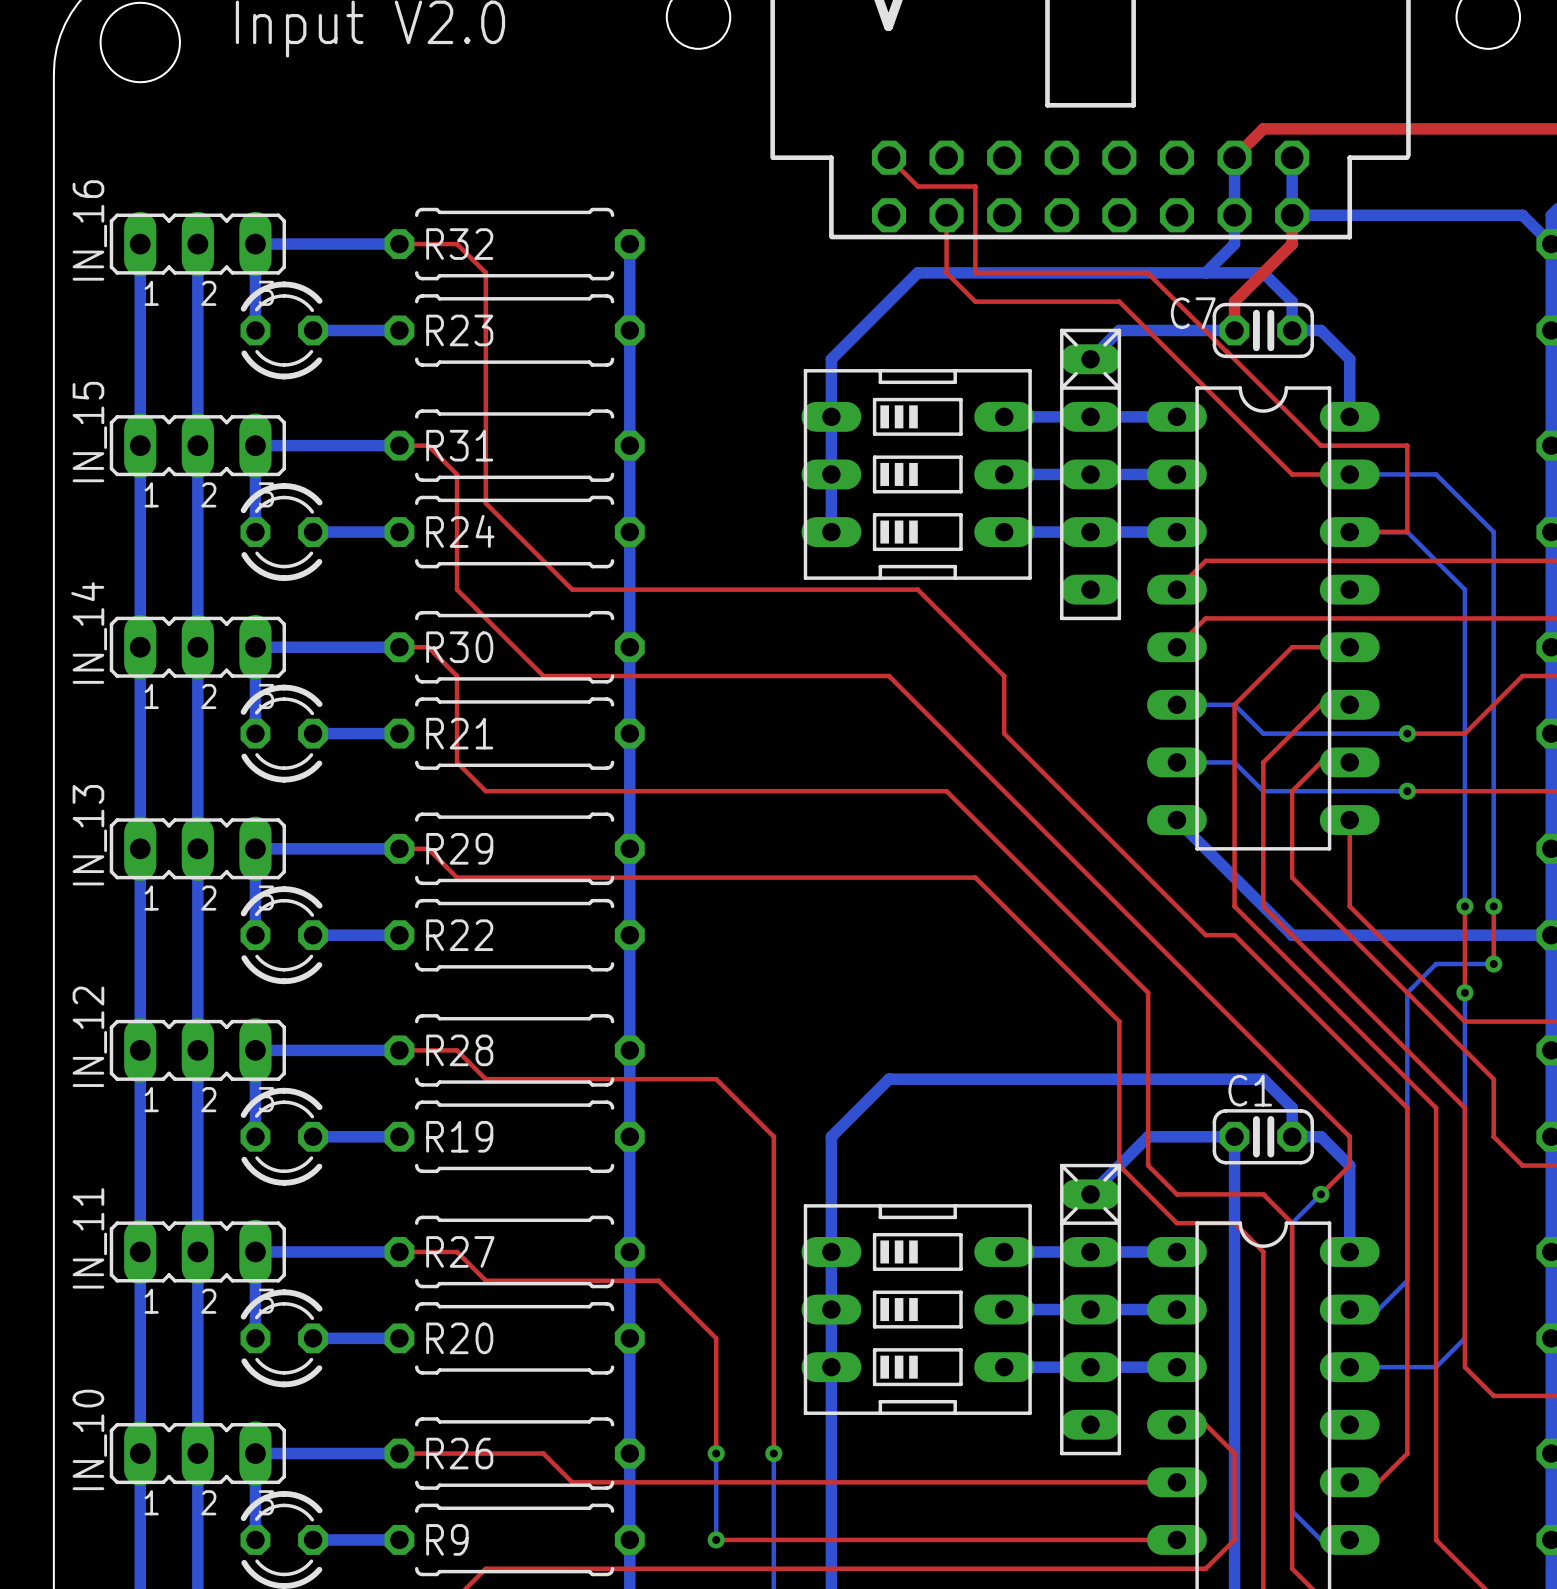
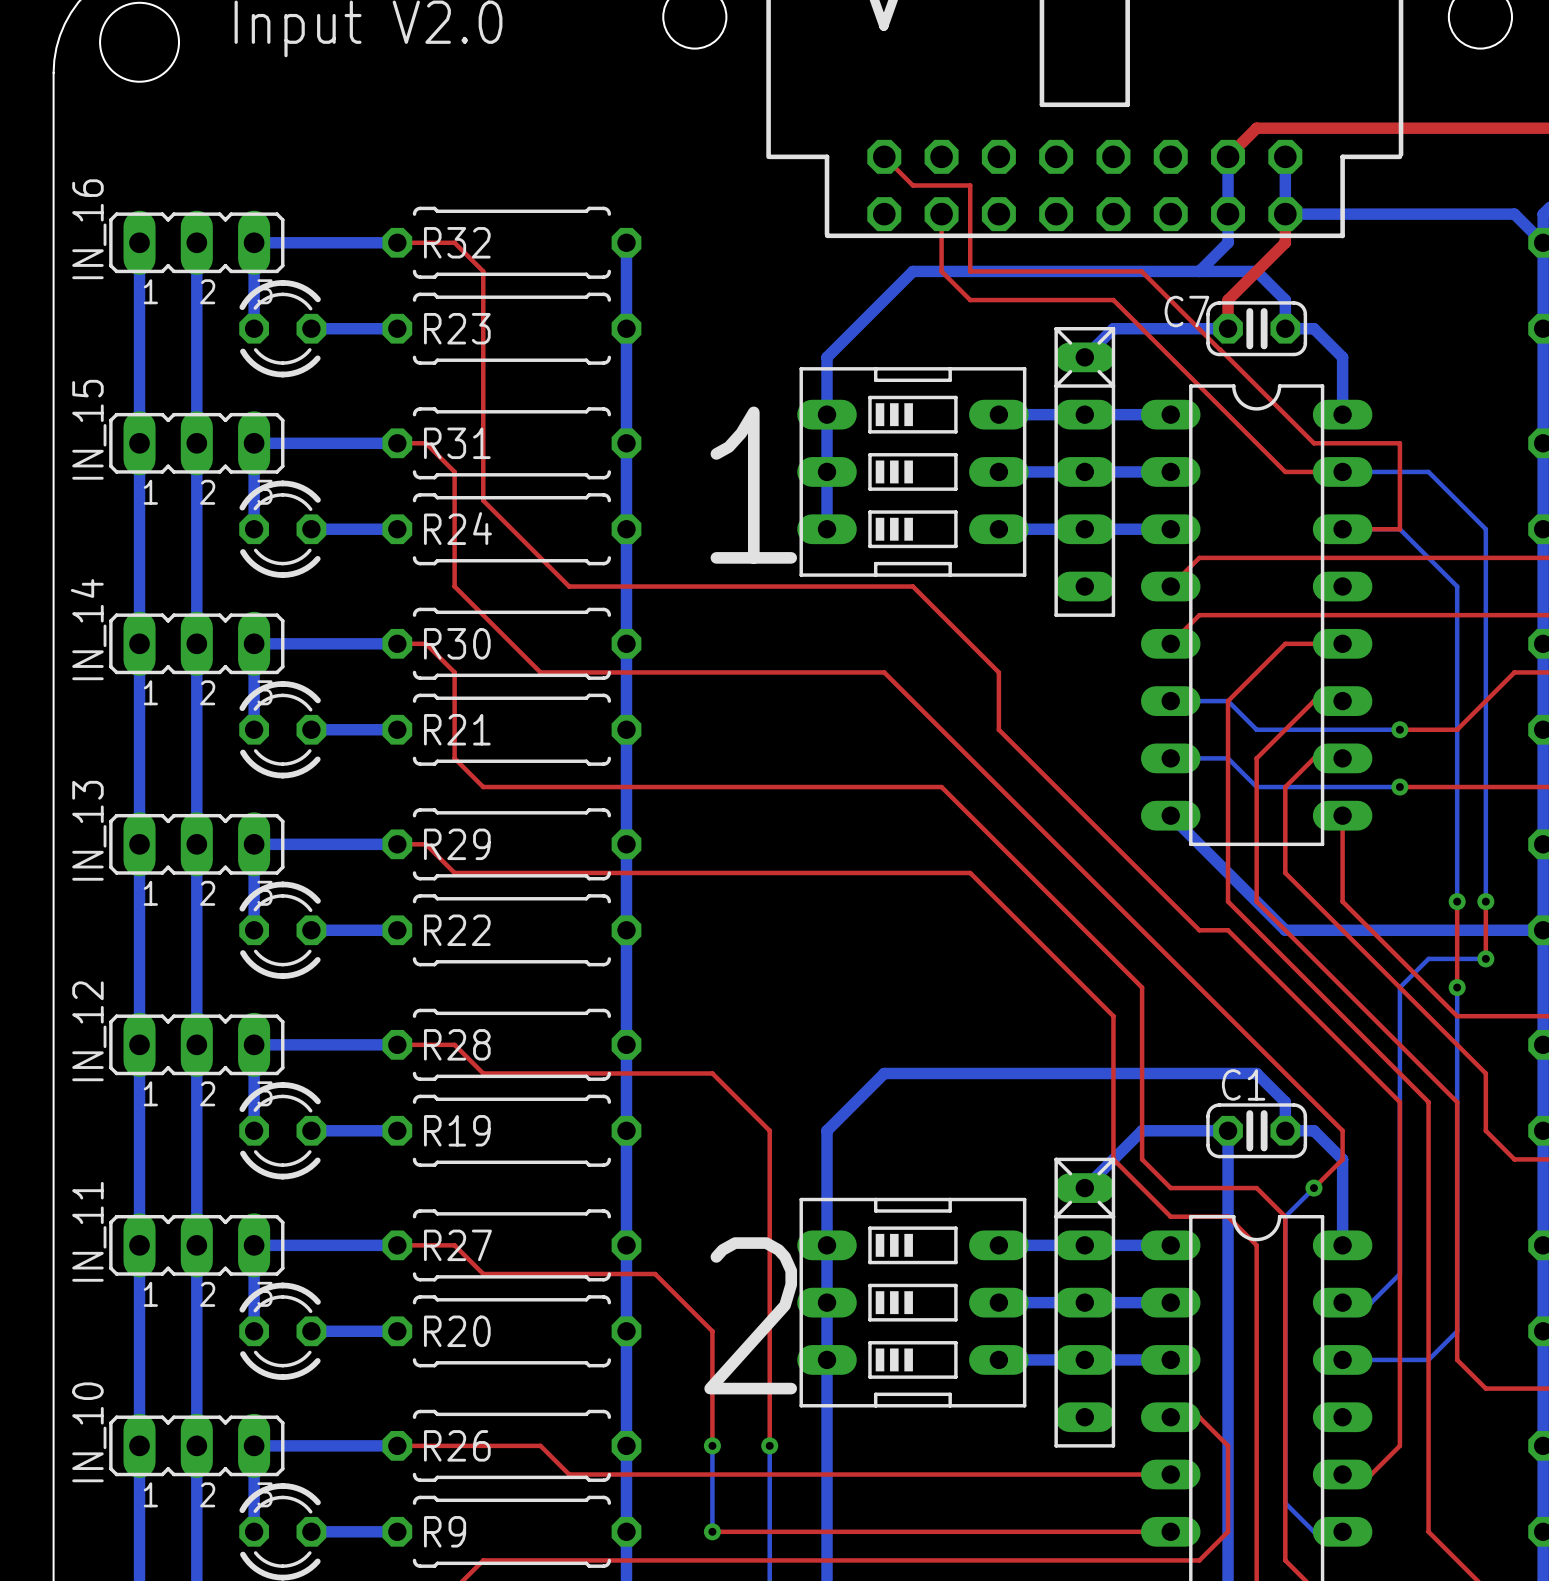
text: none -> 1 (753, 485)
text: none -> 2 (750, 1315)

